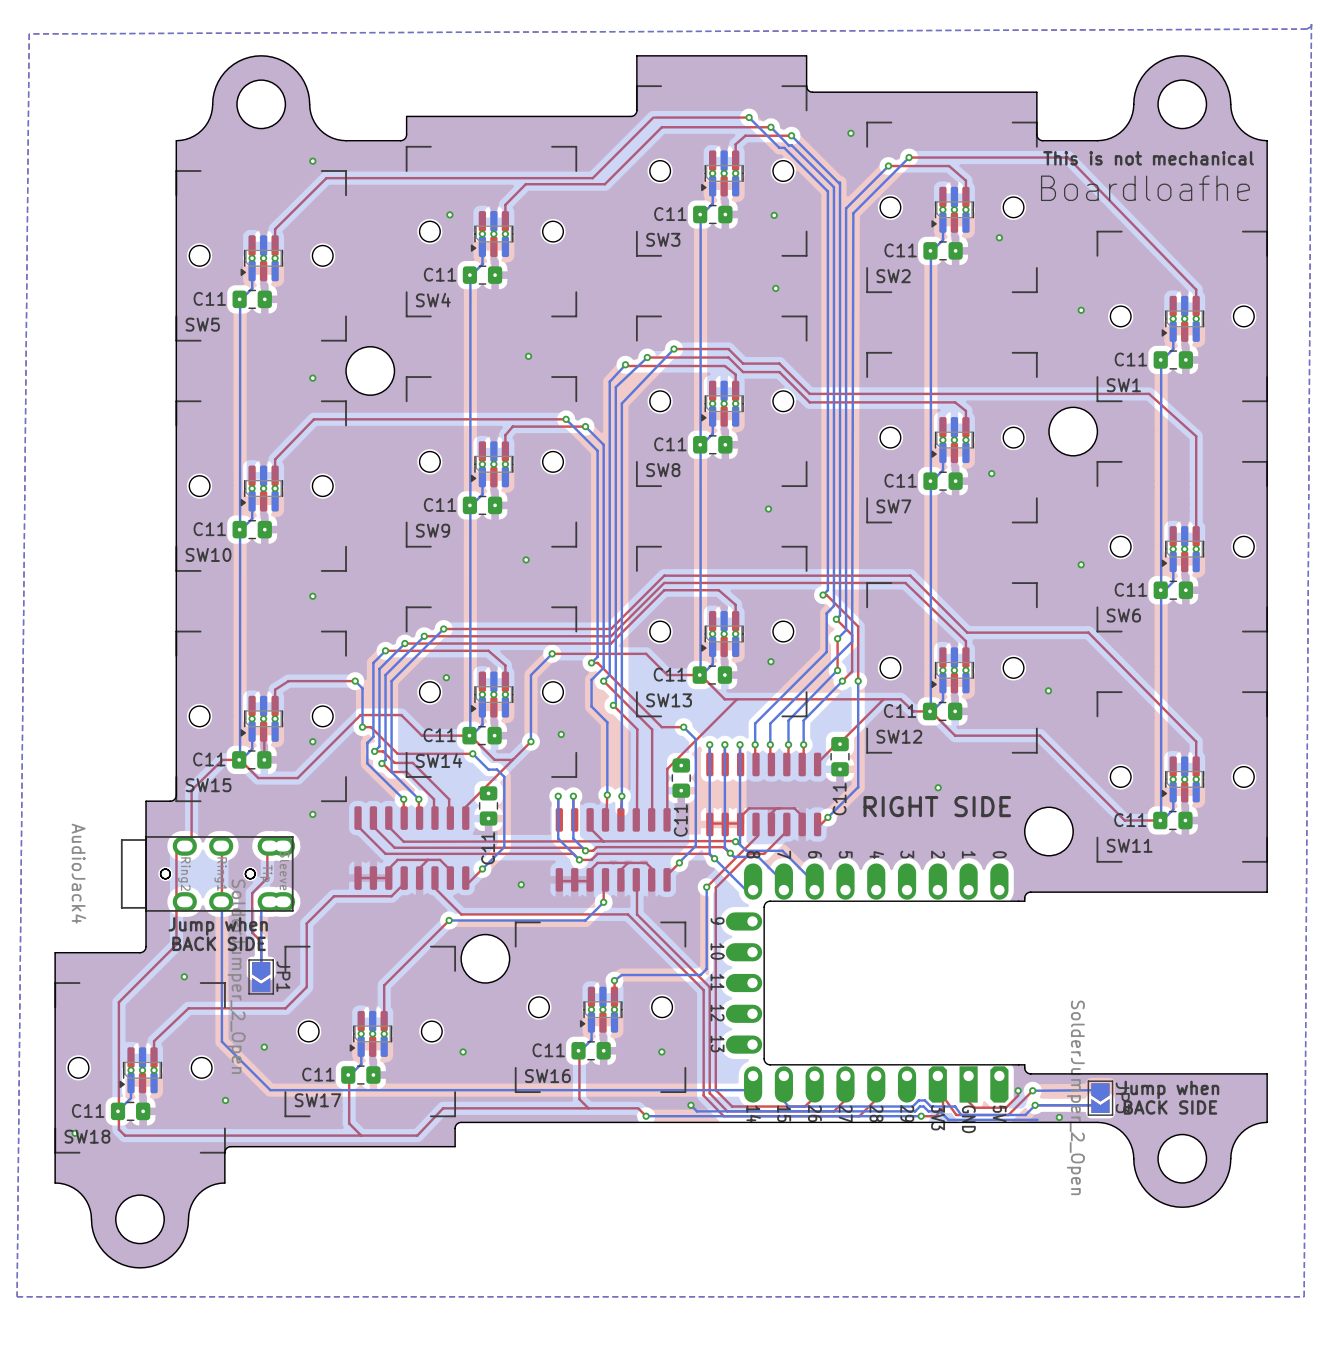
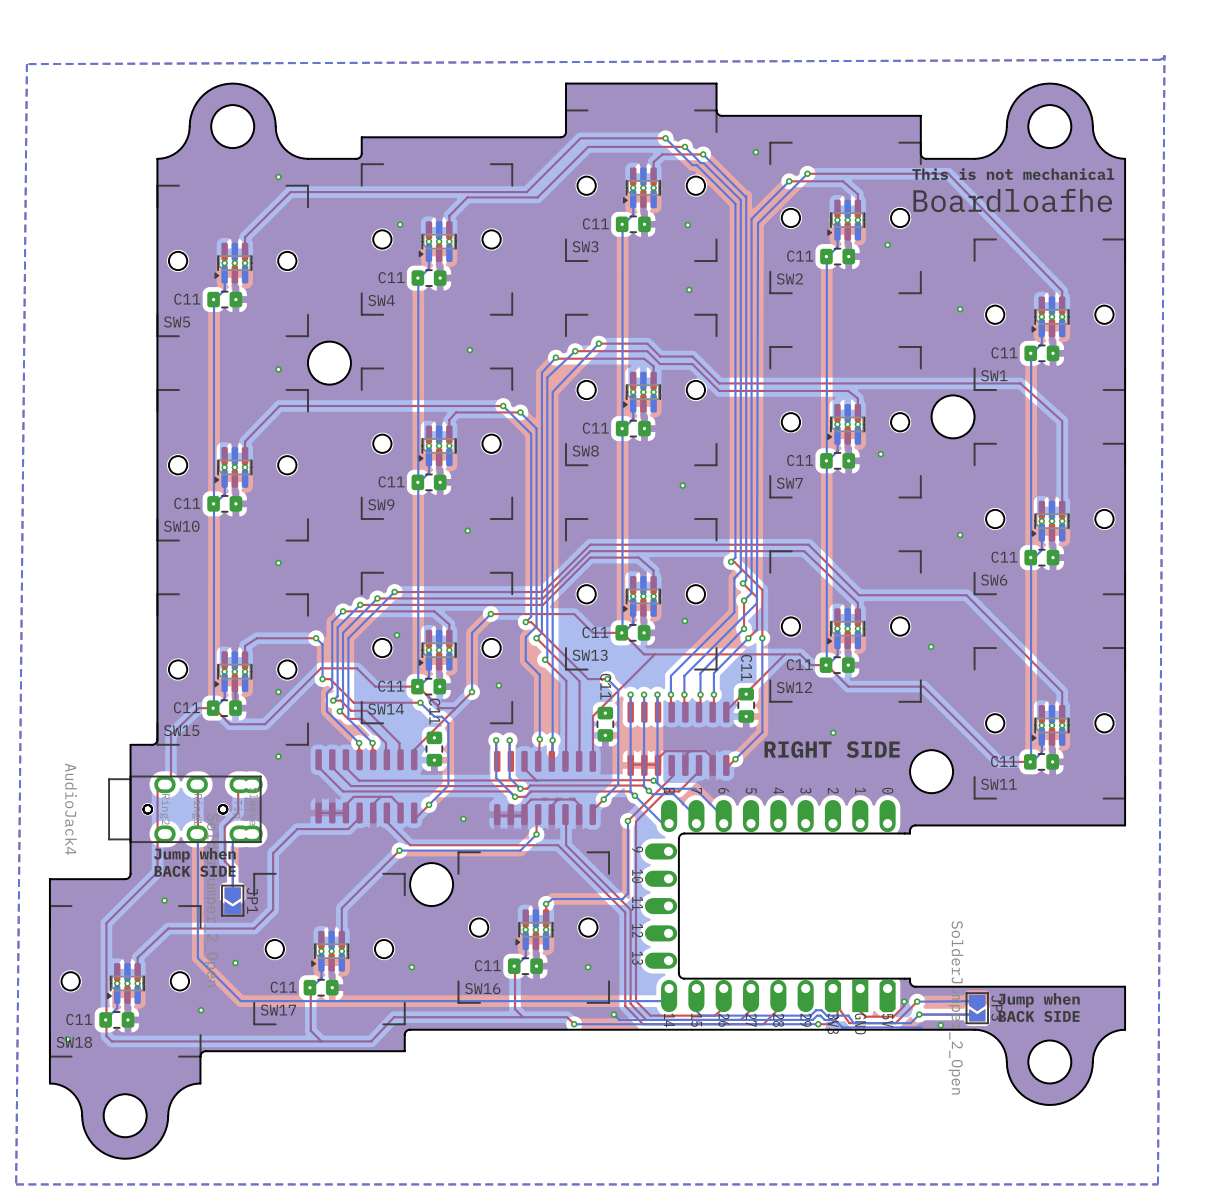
part rotation: 0° (840, 756) -> 180° (746, 705)
part rotation: 0° (681, 778) -> 180° (605, 724)
part rotation: 0° (488, 805) -> 180° (434, 748)

